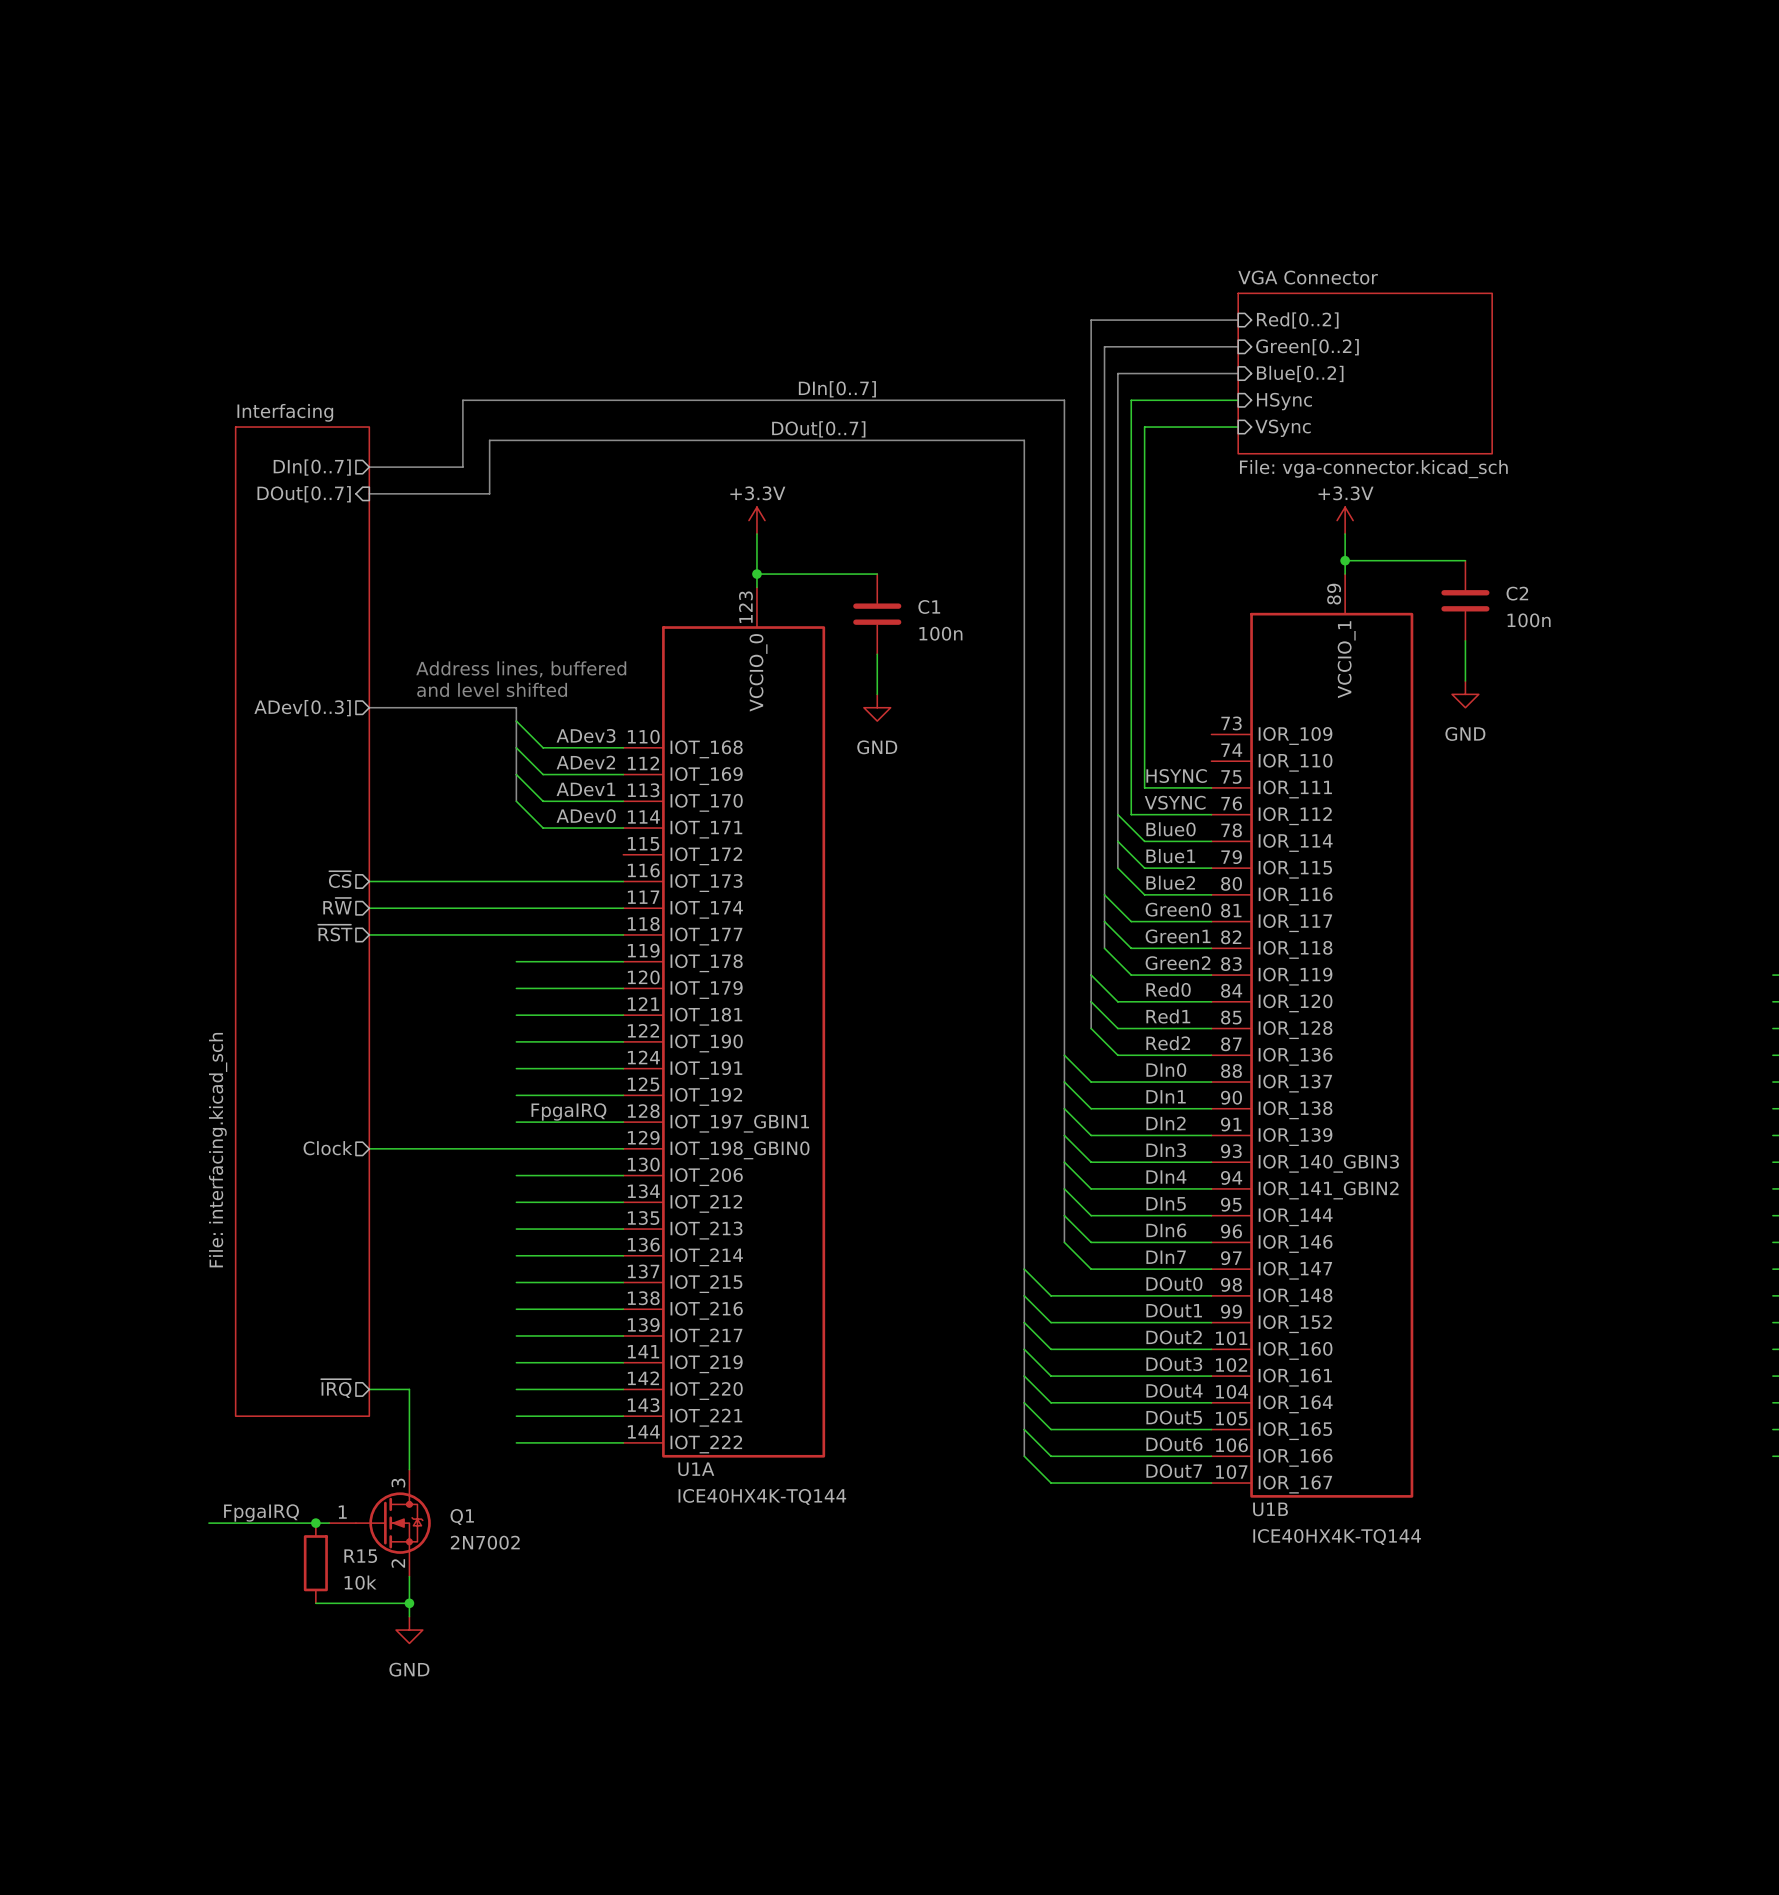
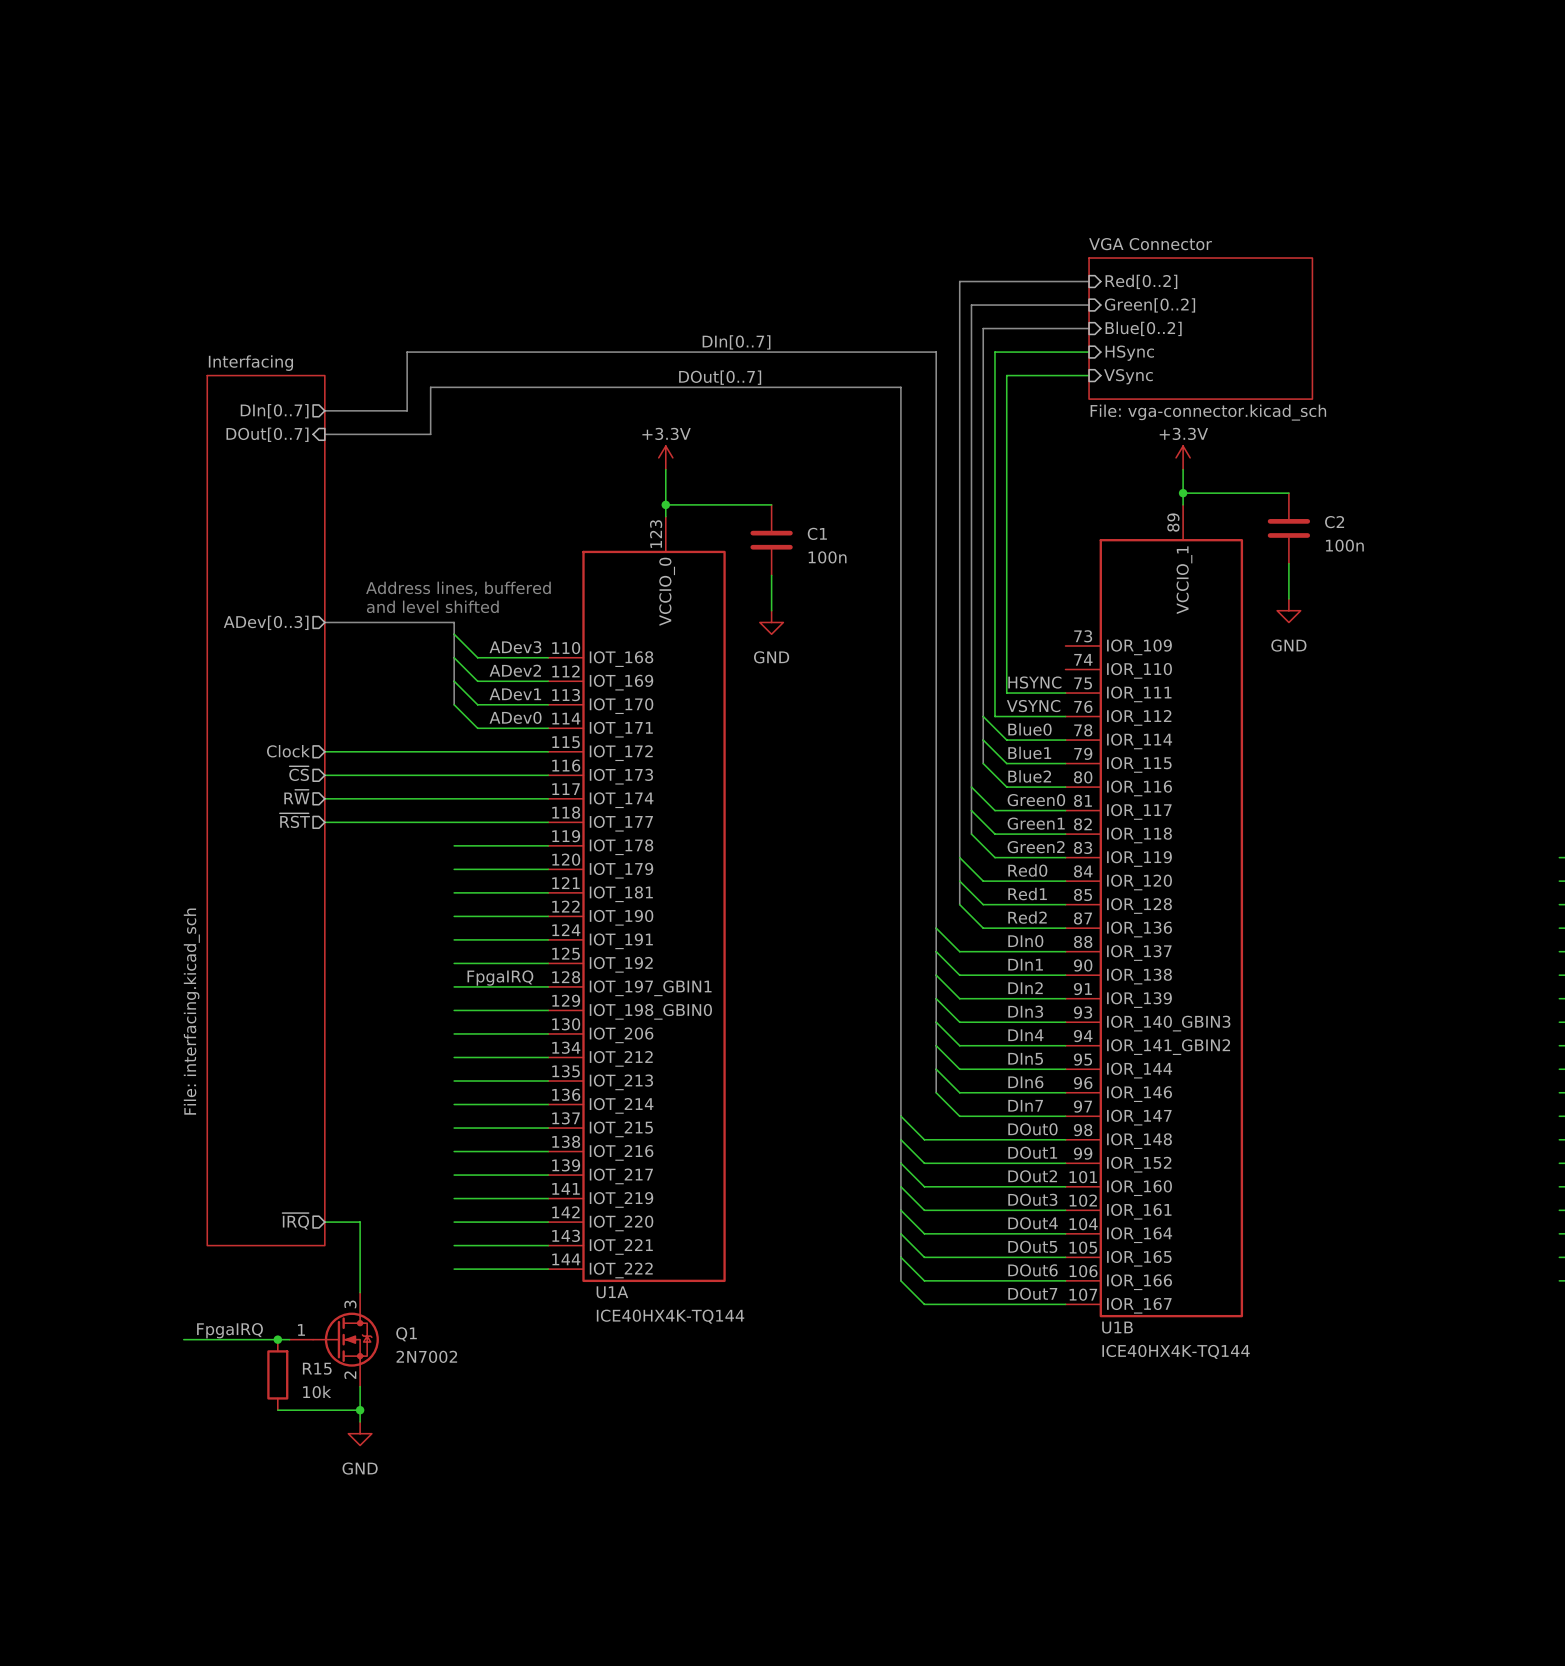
sheet pin: none -> Clock (288, 751)
wire: none -> (324, 751) (548, 751)
sheet pin: Clock (327, 1148) -> none
wire: (369, 1148) (516, 1148) -> none

